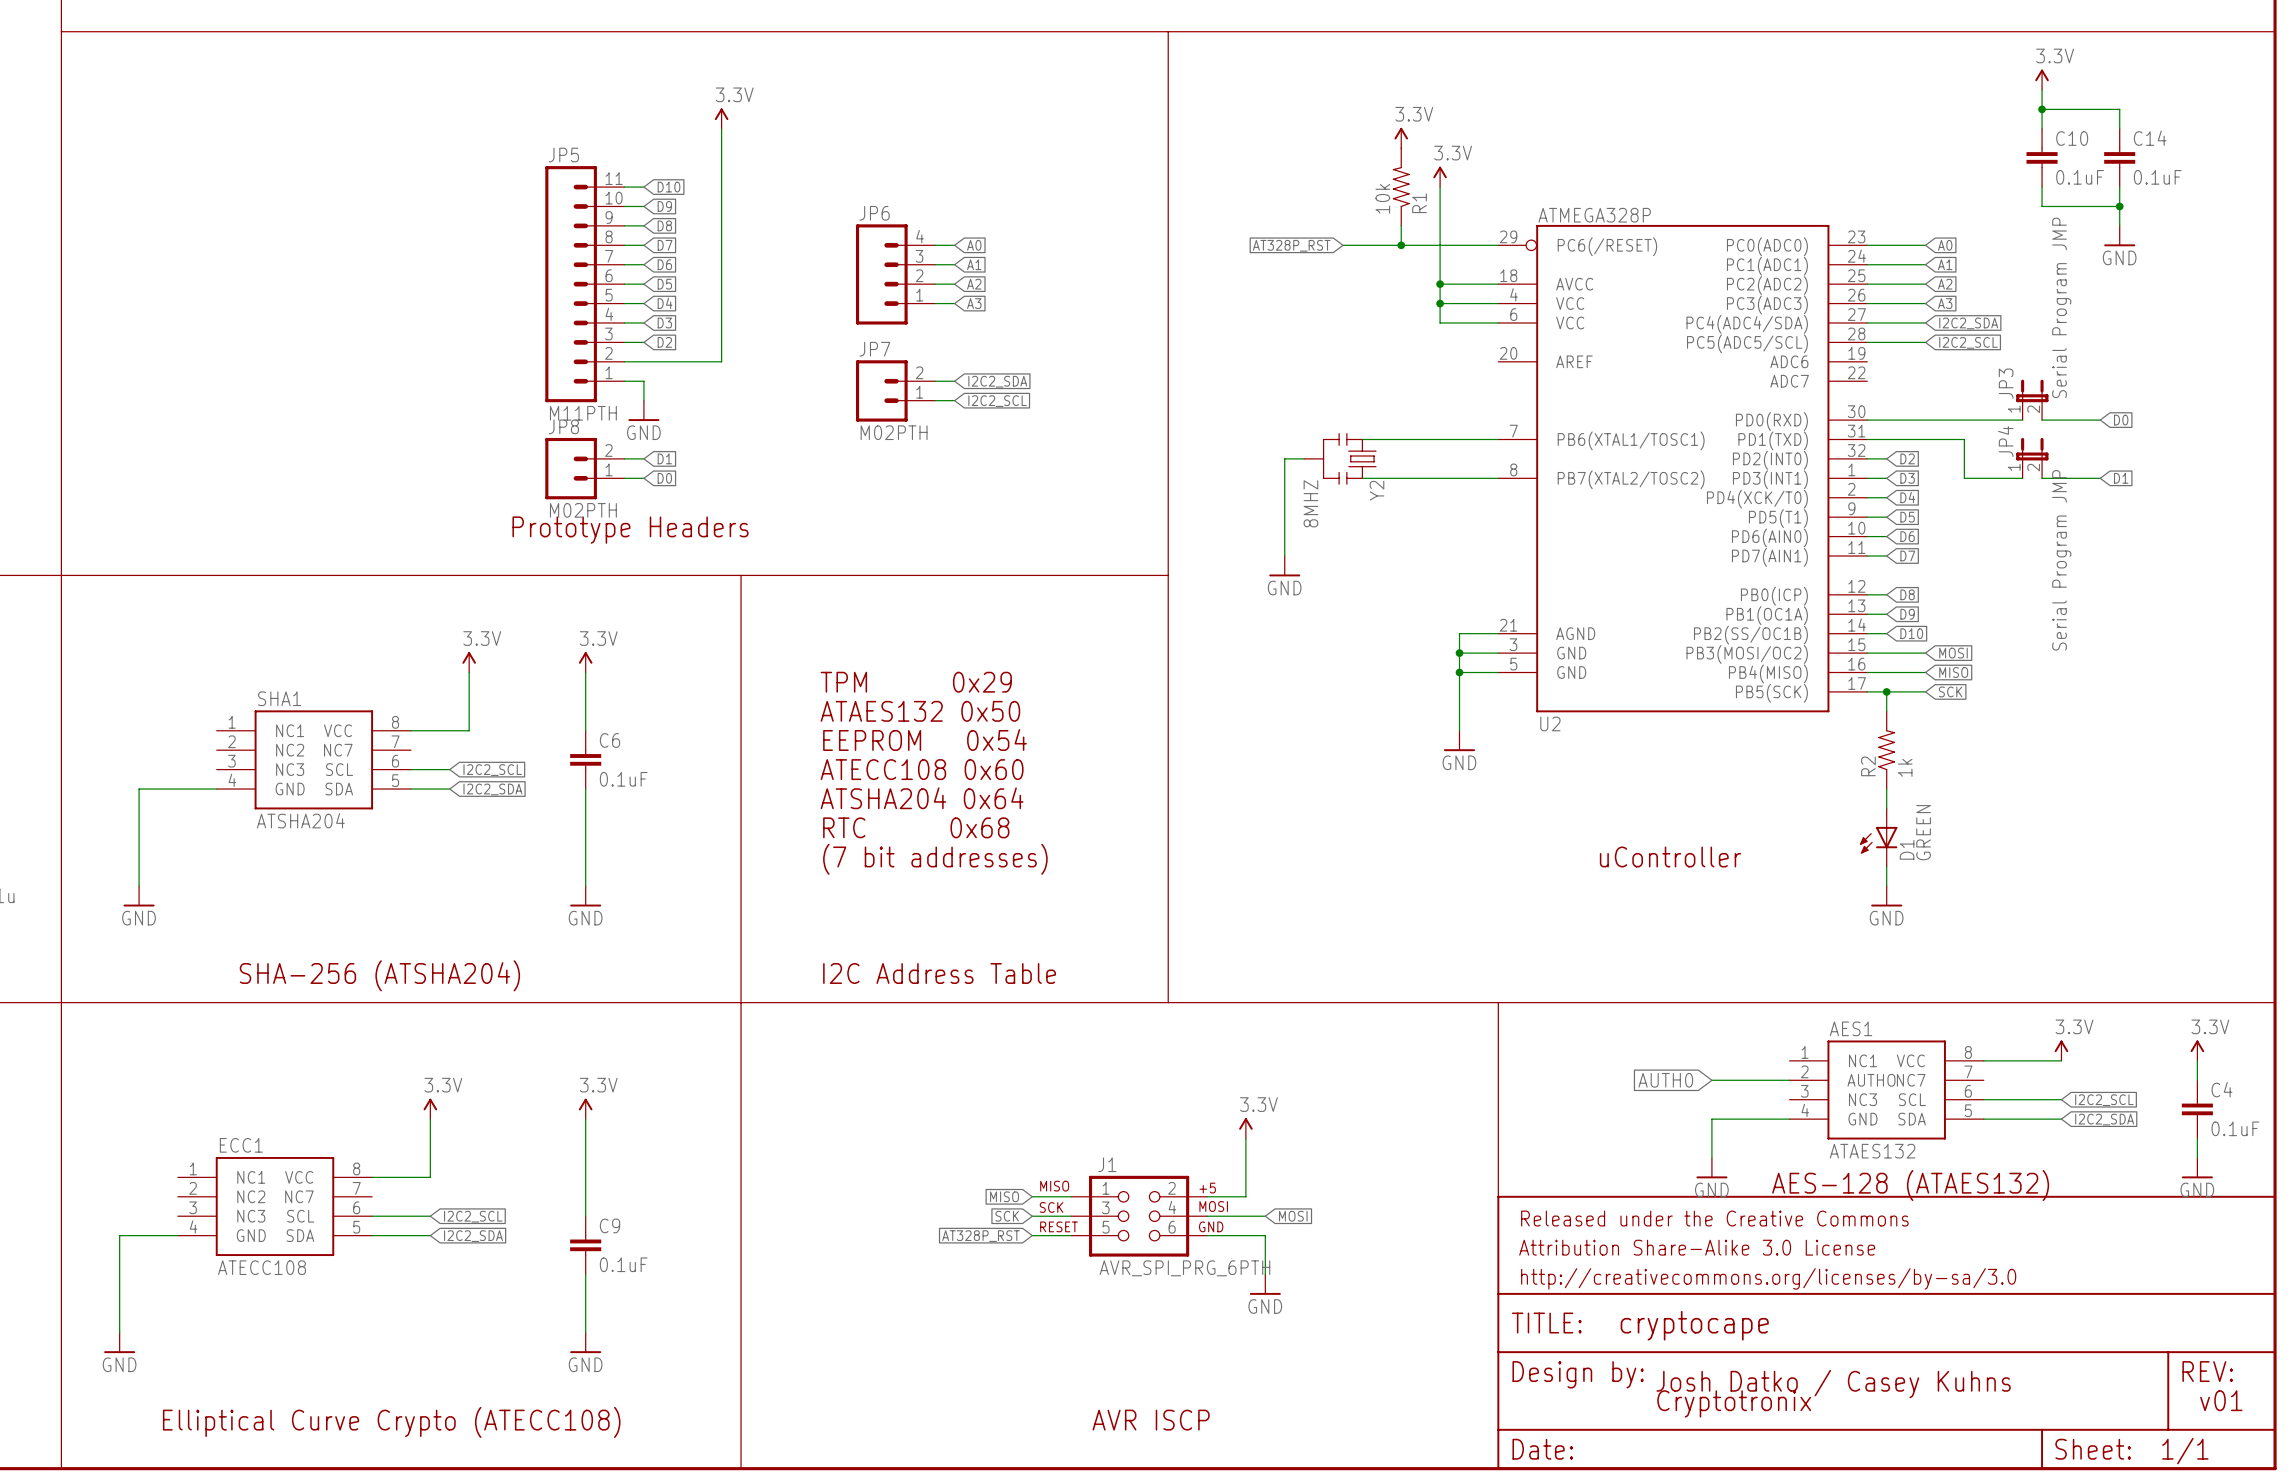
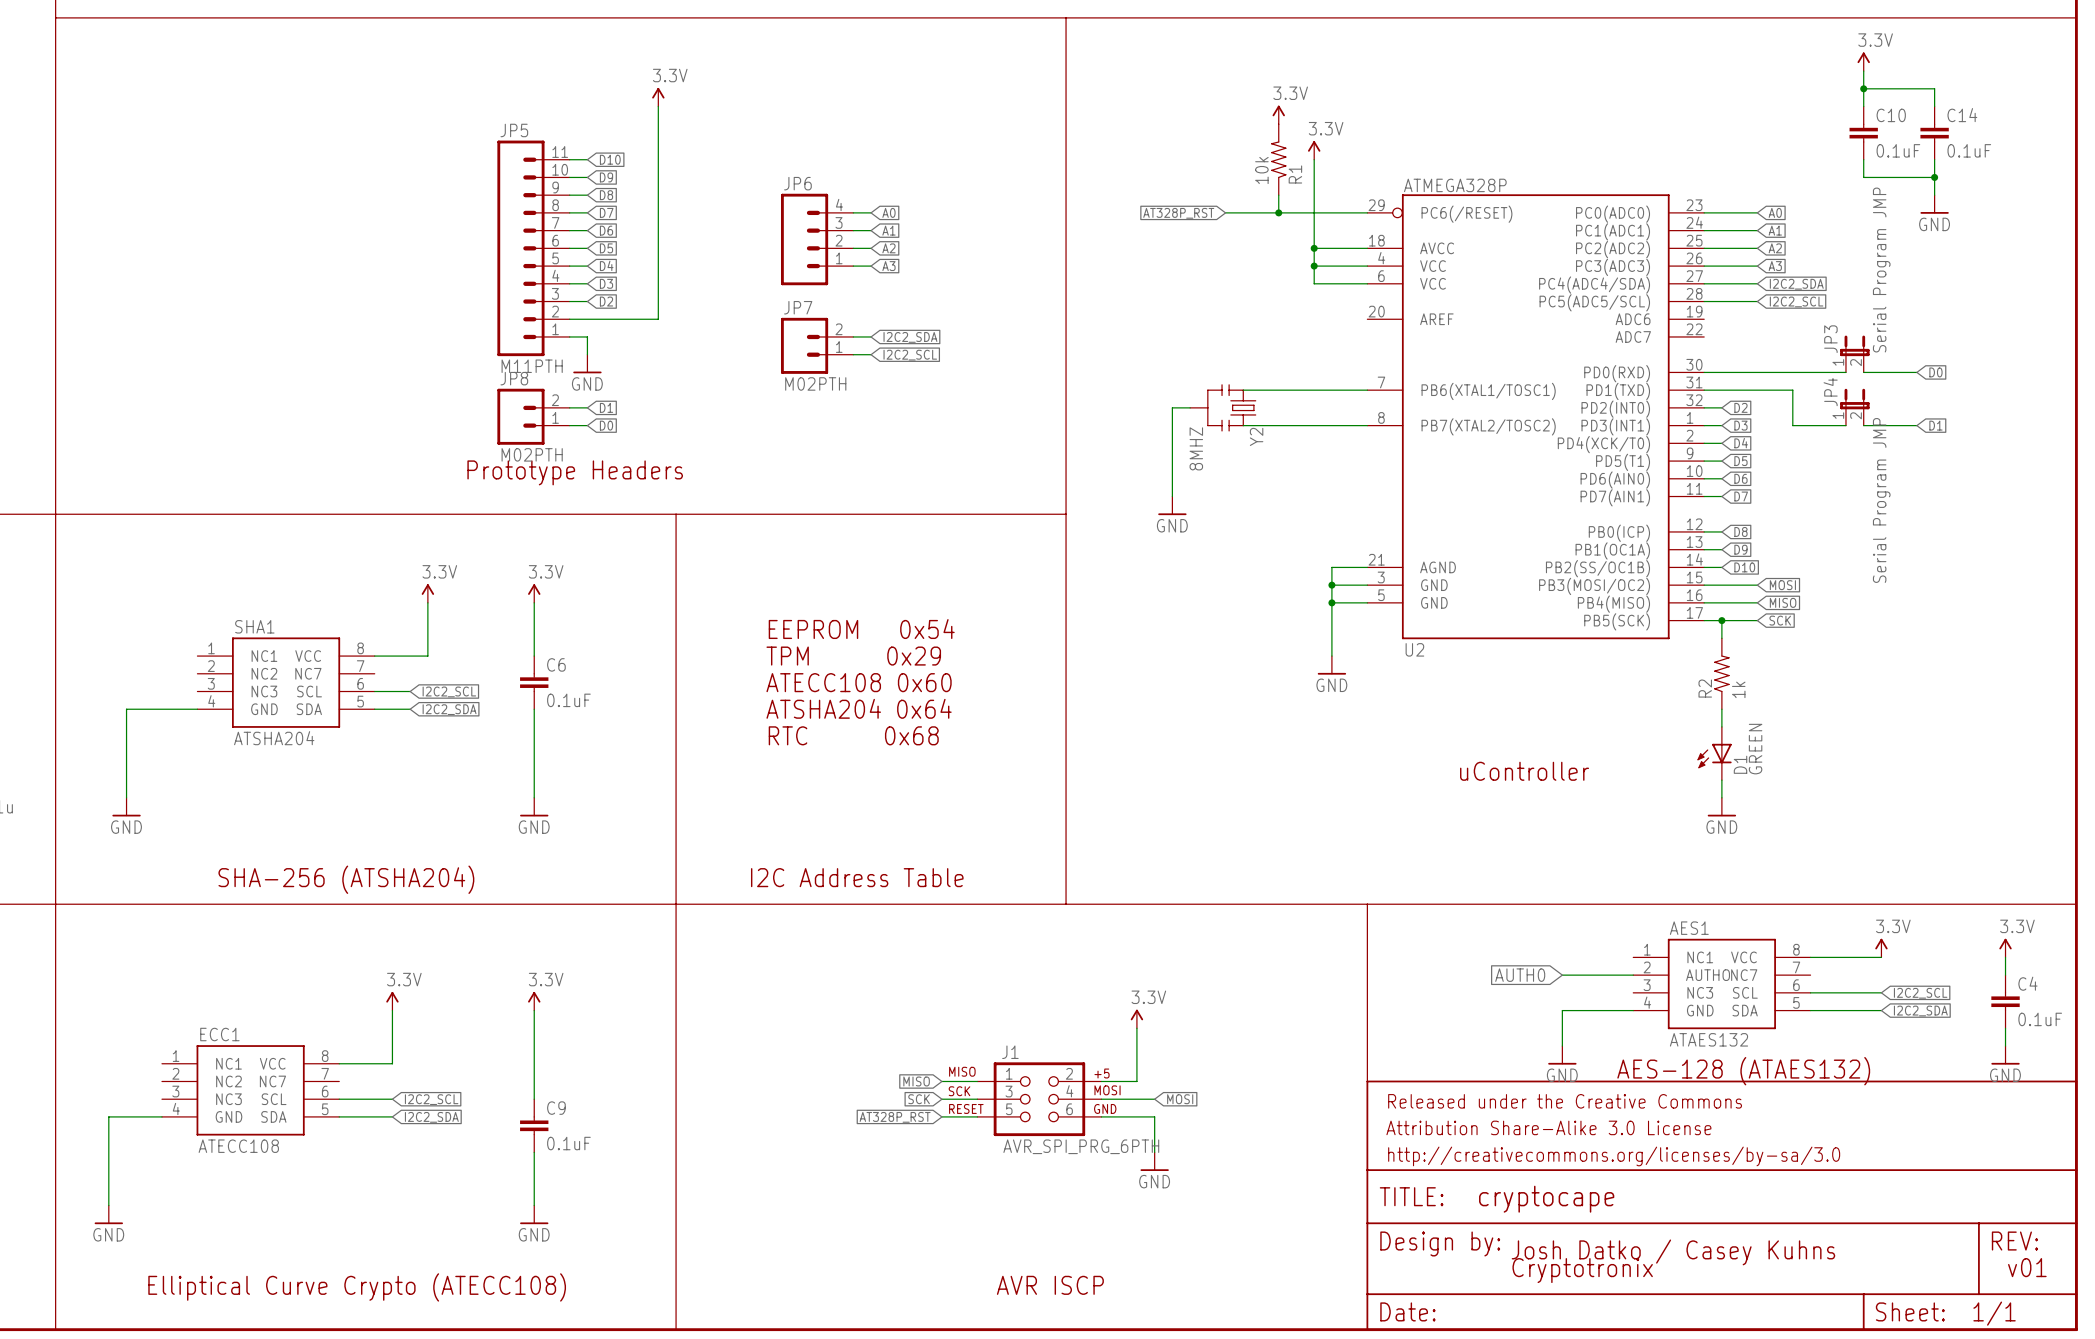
text position: TPM 0x29 (916, 682) -> TPM 0x29 (853, 656)
text: ATAES132 0x50 (920, 711) -> none
text position: EEPROM 0x54 (925, 740) -> EEPROM 0x54 (861, 629)
text position: ATECC108 0x60 (922, 769) -> ATECC108 0x60 (859, 682)
text position: ATSHA204 0x64 (922, 798) -> ATSHA204 0x64 (859, 708)
text position: RTC 0x68 (916, 827) -> RTC 0x68 (853, 735)
text: (7 bit addresses) (935, 859) -> none

